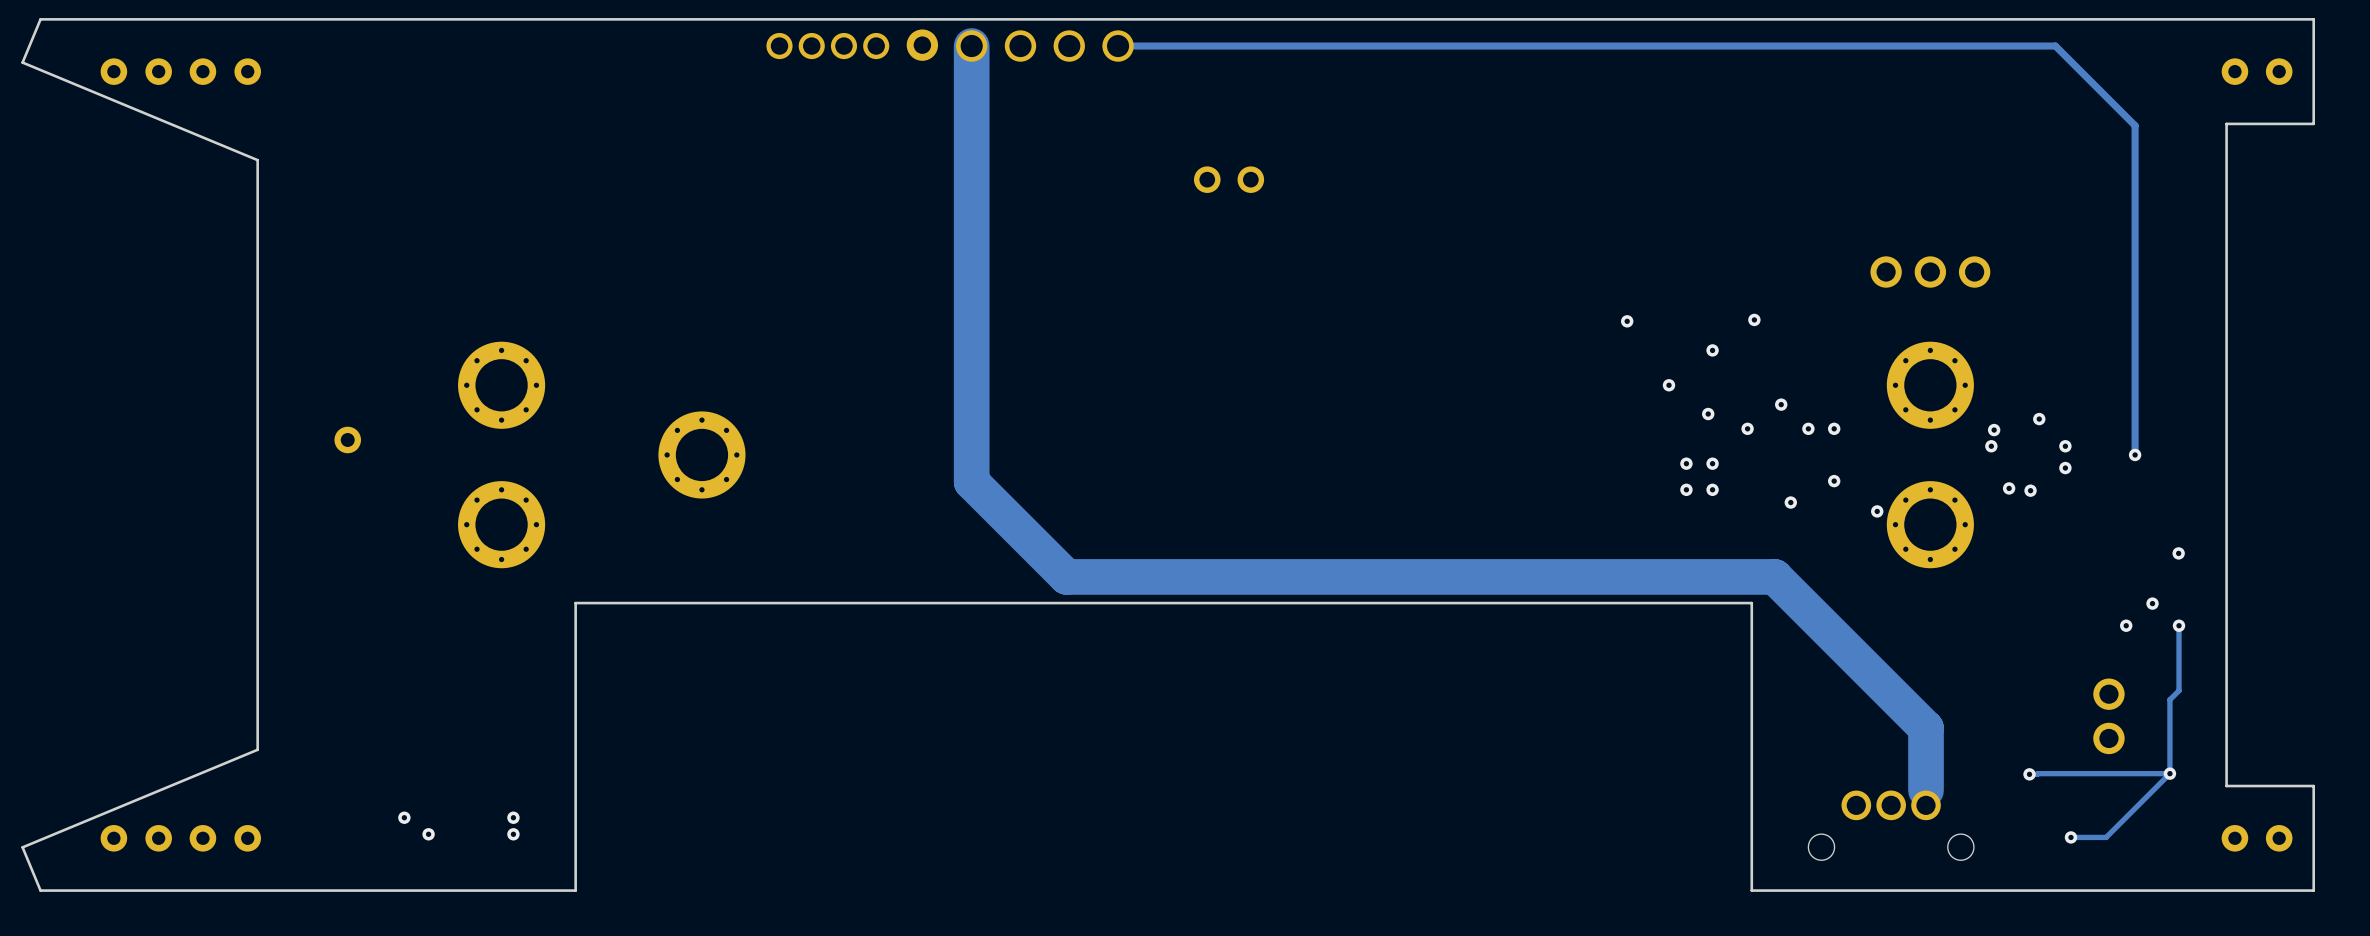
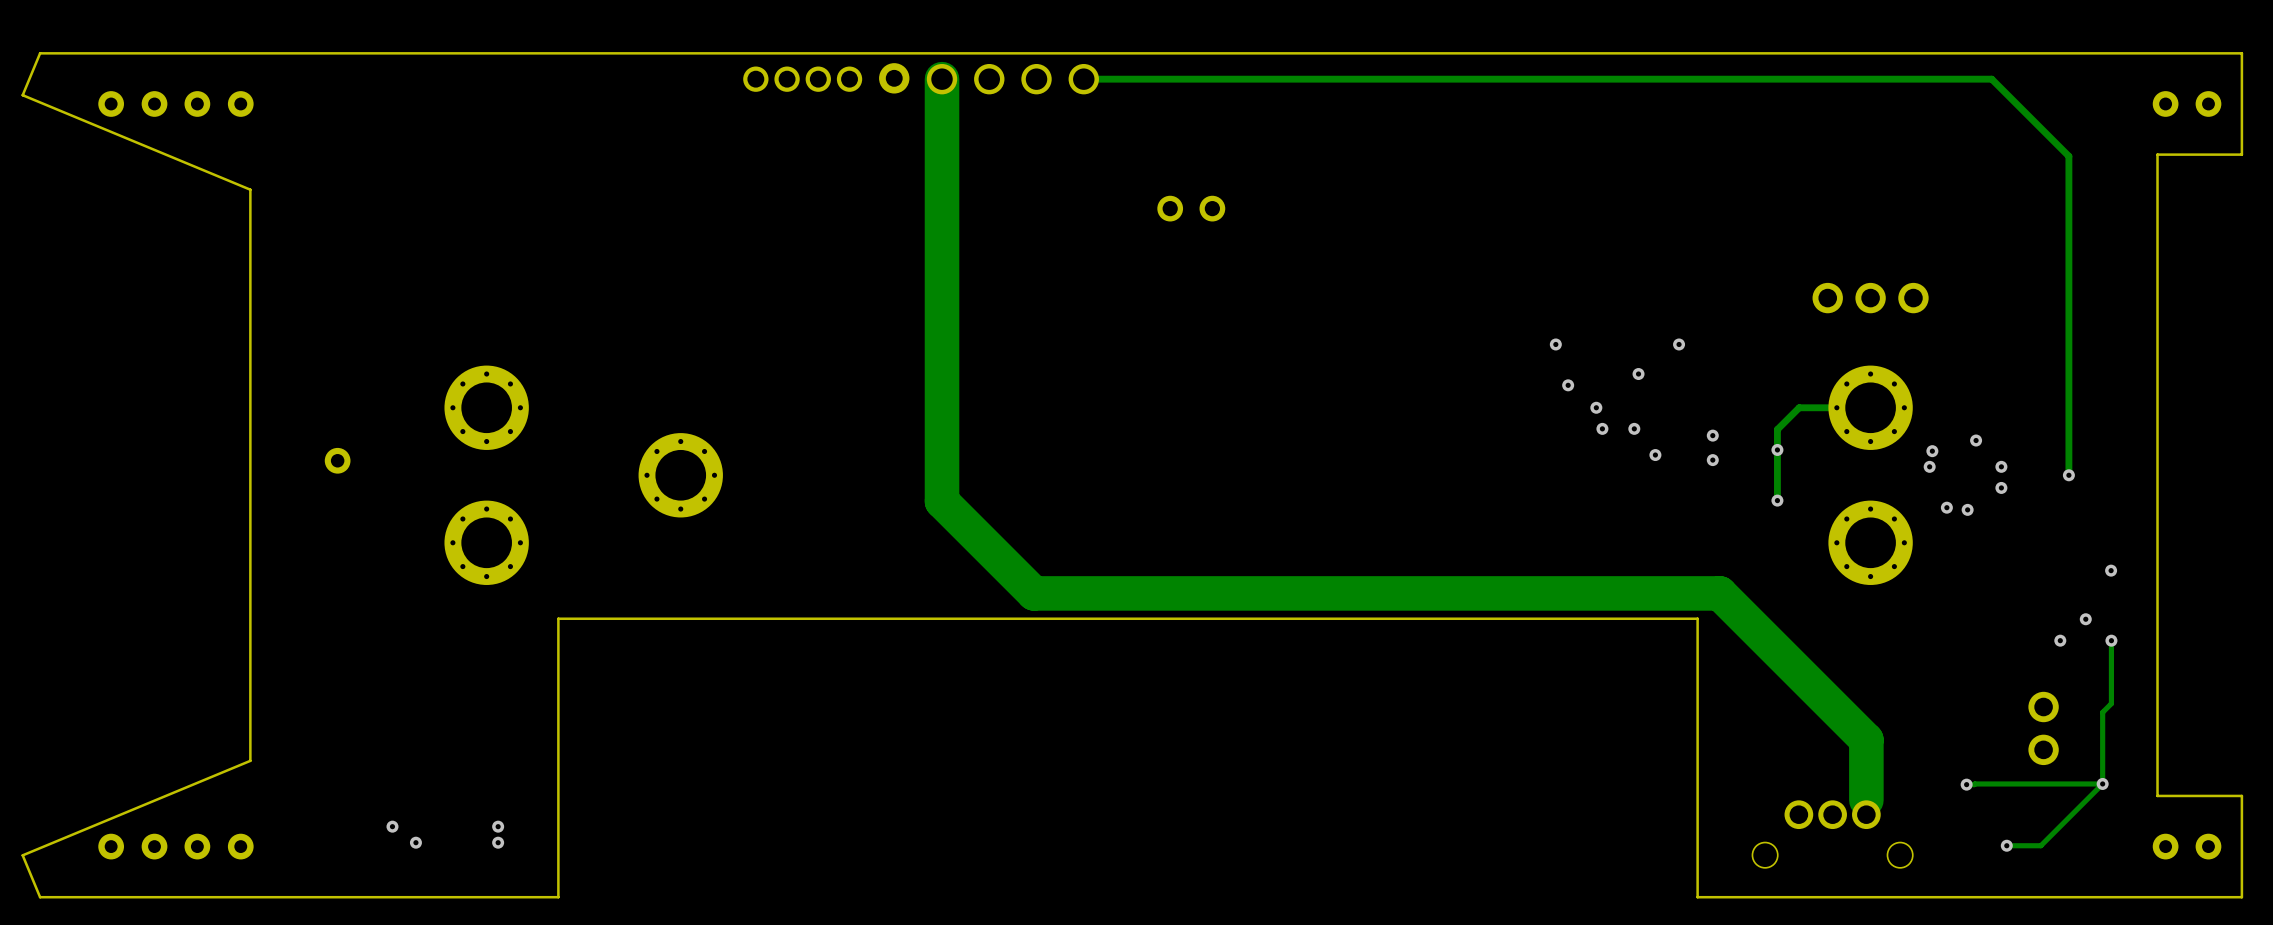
via: none -> (1555, 344)
via: none -> (1679, 344)
via: (1754, 319) -> none
via: (1627, 321) -> none
via: none -> (1638, 374)
via: (1712, 350) -> none
via: none -> (1568, 385)
via: none -> (1596, 407)
via: (1669, 385) -> none
track: none -> (1870, 407) (1799, 407) (1777, 429) (1777, 500)
via: (1781, 404) -> none
via: none -> (1602, 428)
via: none -> (1634, 428)
via: (1708, 414) -> none
via: none -> (1712, 435)
via: (1747, 428) -> none
via: (1808, 428) -> none
via: none -> (1655, 455)
via: none -> (1712, 460)
via: (1686, 463) -> none
via: (1712, 463) -> none
via: (1686, 489) -> none
via: (1712, 489) -> none
via: (1790, 502) -> none
via: (1877, 511) -> none

